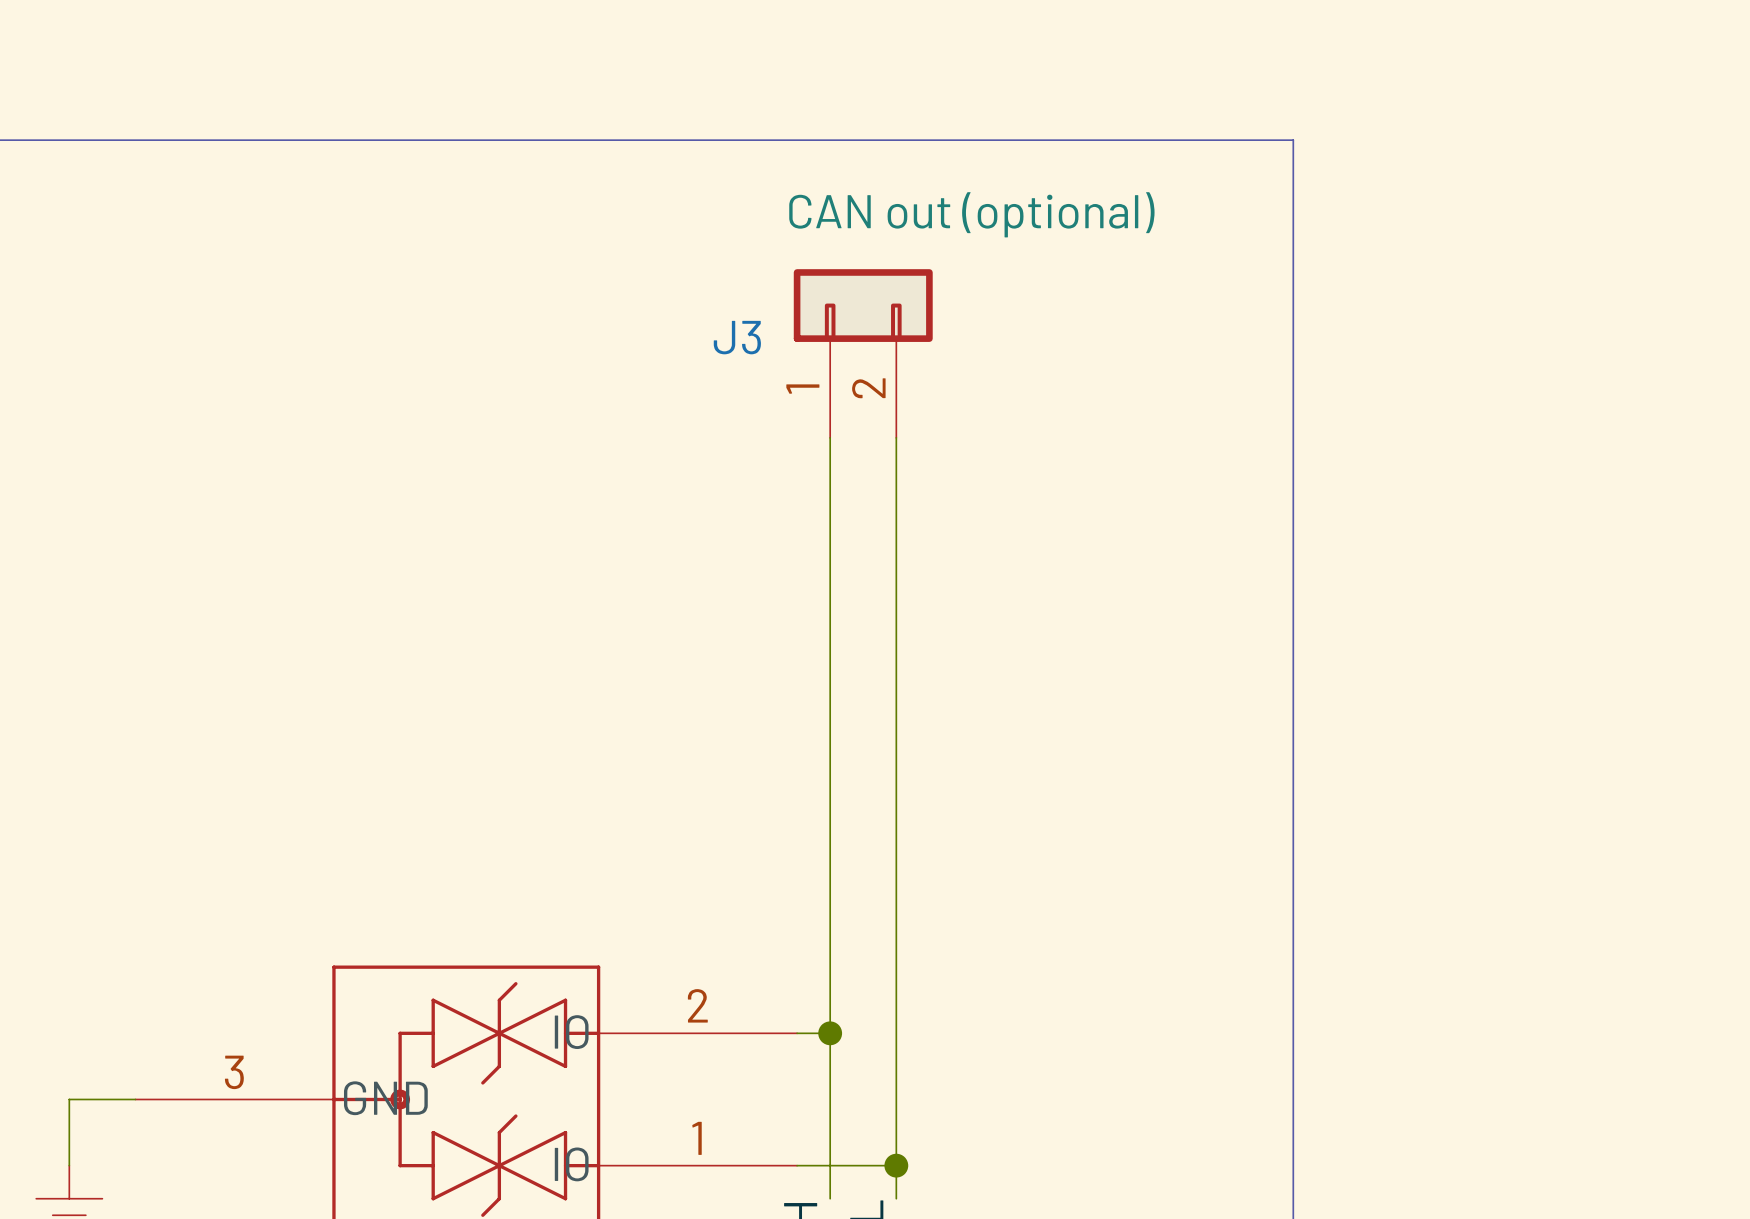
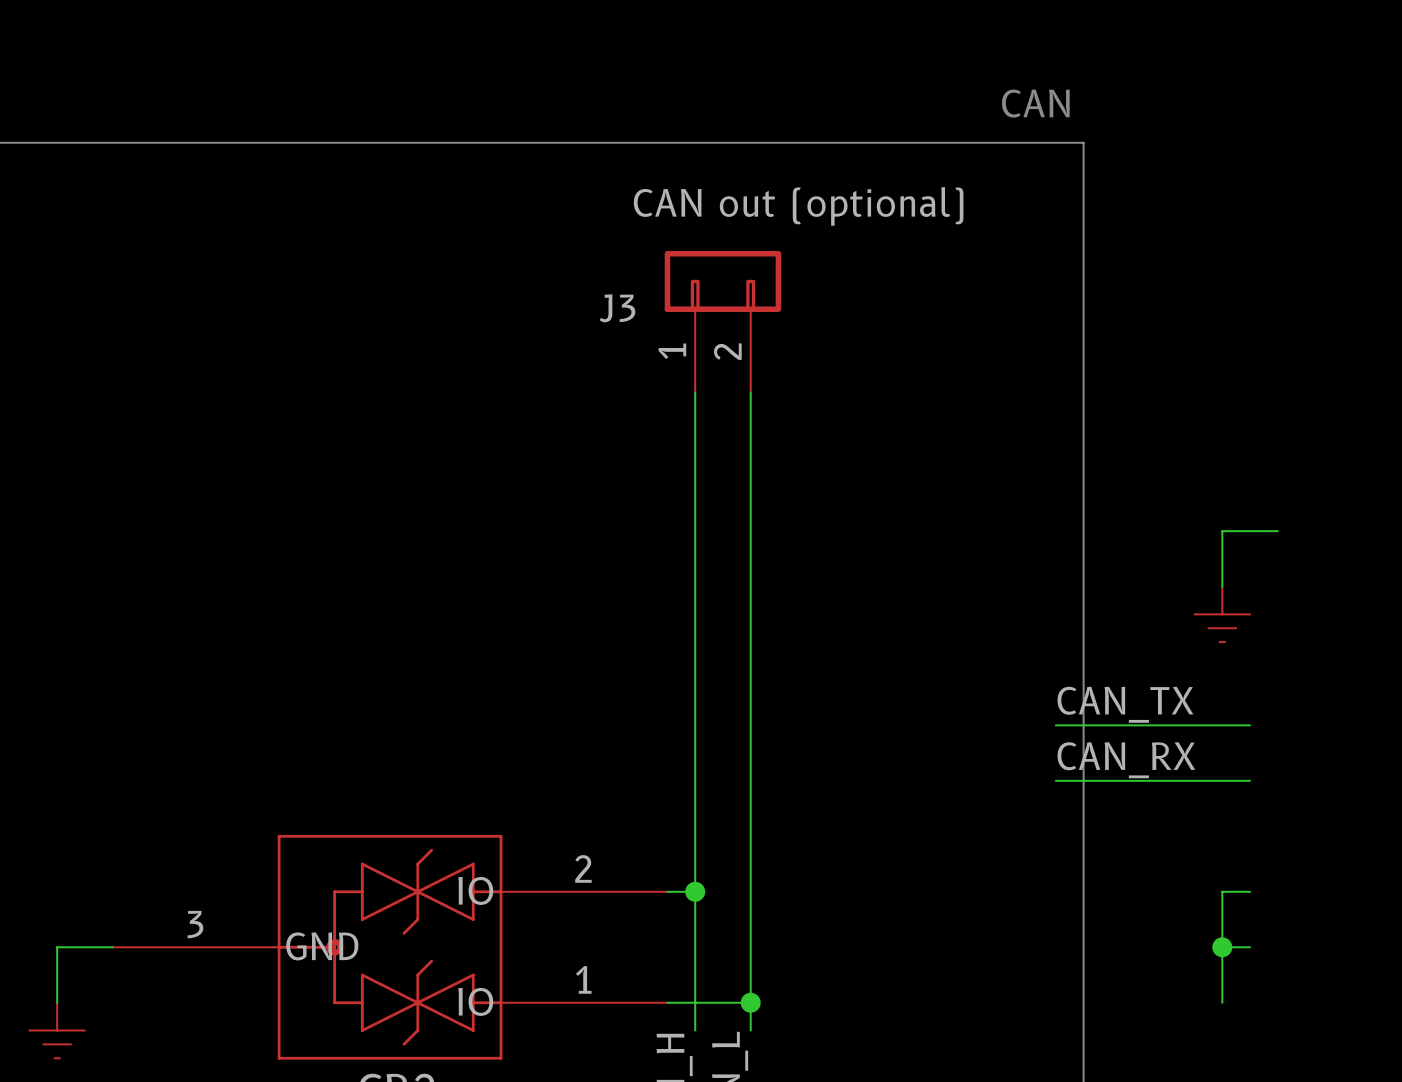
text: none -> CAN (1035, 103)
wire: none -> (1277, 531) (1222, 531) (1222, 586)
power symbol: none -> (1222, 614)
label: none -> CAN_TX (1125, 704)
wire: none -> (1055, 725) (1250, 725)
label: none -> CAN_RX (1126, 760)
wire: none -> (1055, 780) (1250, 780)
wire: none -> (1250, 891) (1222, 891) (1222, 1002)
wire: none -> (1222, 947) (1250, 947)
junction: none -> (1222, 947)

